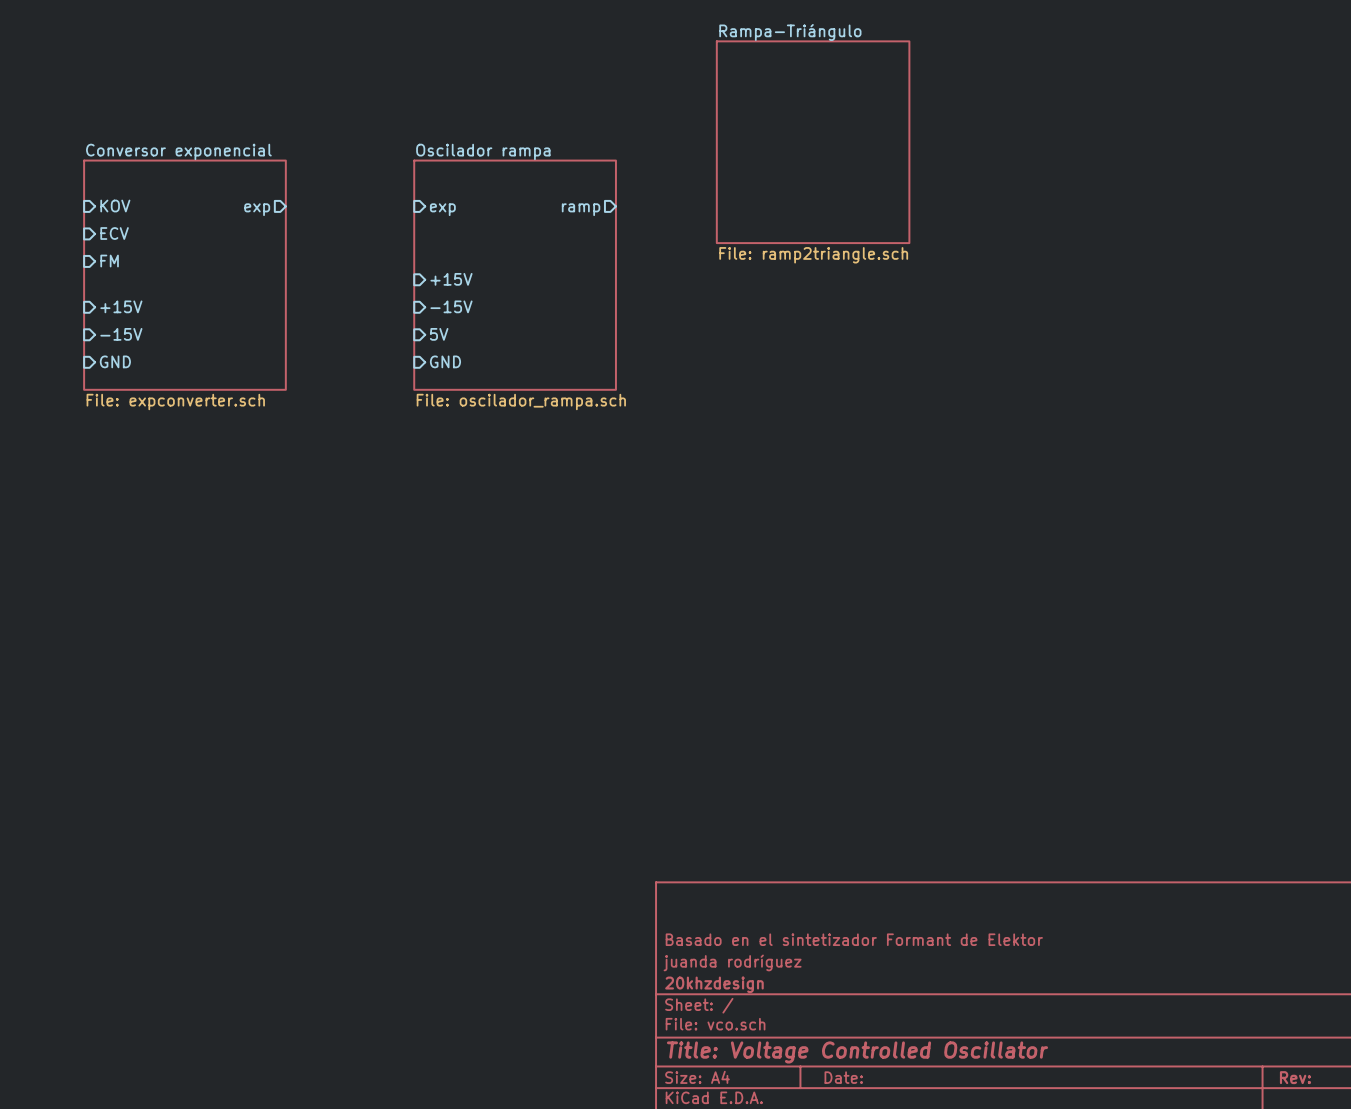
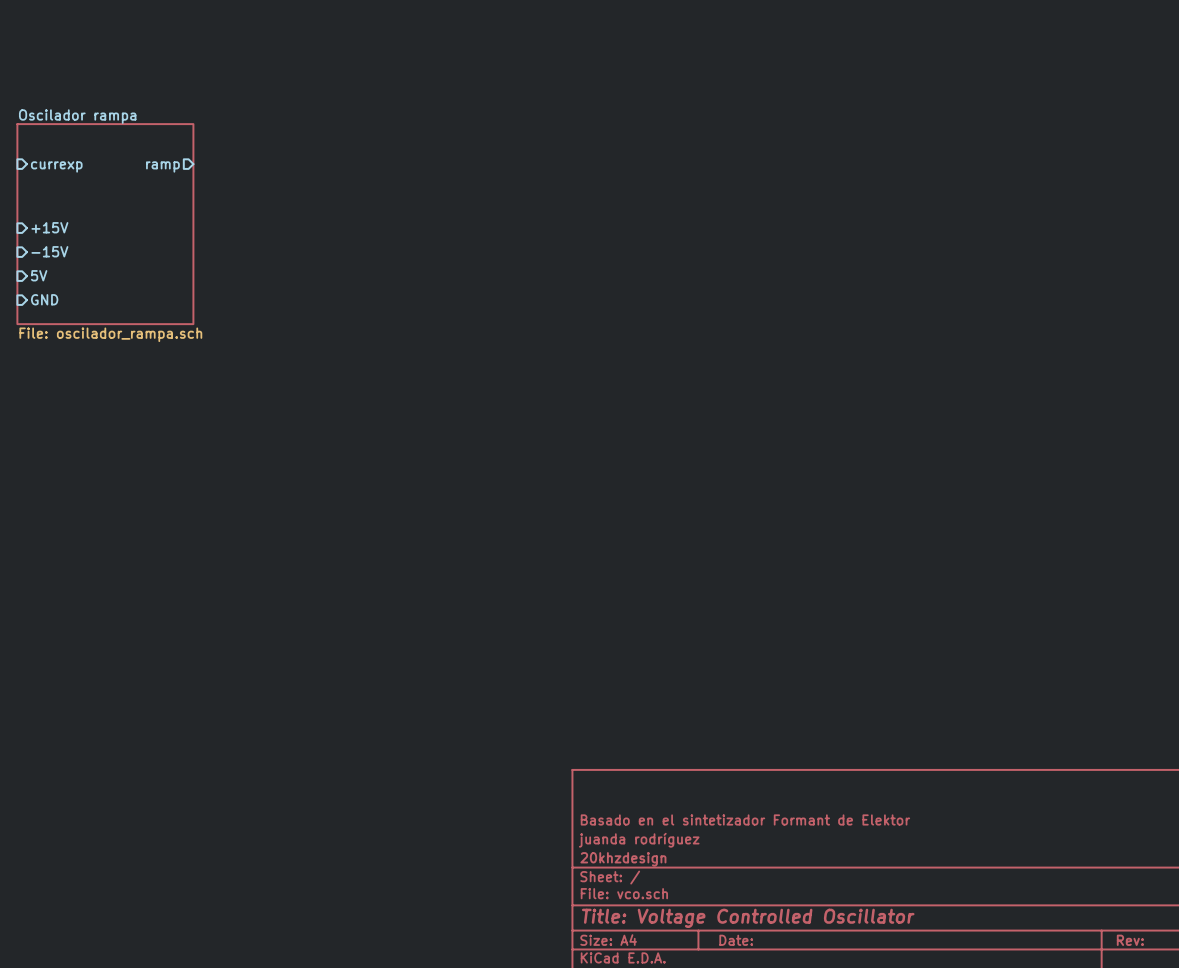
sheet Rampa-Triángulo: File: ramp2triangle.sch (813, 142) -> none
sheet pin: none -> currexp (56, 166)
sheet pin: none -> ramp (162, 166)
sheet pin: KOV (115, 206) -> none
sheet pin: exp (257, 209) -> none
sheet pin: exp (442, 209) -> none
sheet pin: ramp (581, 209) -> none
sheet pin: ECV (114, 233) -> none
sheet Oscilador rampa: none -> File: oscilador_rampa.sch (105, 224)
sheet pin: FM (109, 261) -> none
sheet Conversor exponencial: File: expconverter.sch (184, 275) -> none
sheet Oscilador rampa: File: oscilador_rampa.sch (515, 275) -> none
sheet pin: +15V (451, 279) -> none
sheet pin position: +15V (121, 306) -> +15V (49, 227)
sheet pin: -15V (451, 306) -> none
sheet pin: none -> 5V (39, 275)
sheet pin position: -15V (121, 334) -> -15V (49, 251)
sheet pin: 5V (439, 334) -> none
sheet pin position: GND (115, 361) -> GND (44, 299)
sheet pin: GND (445, 361) -> none

